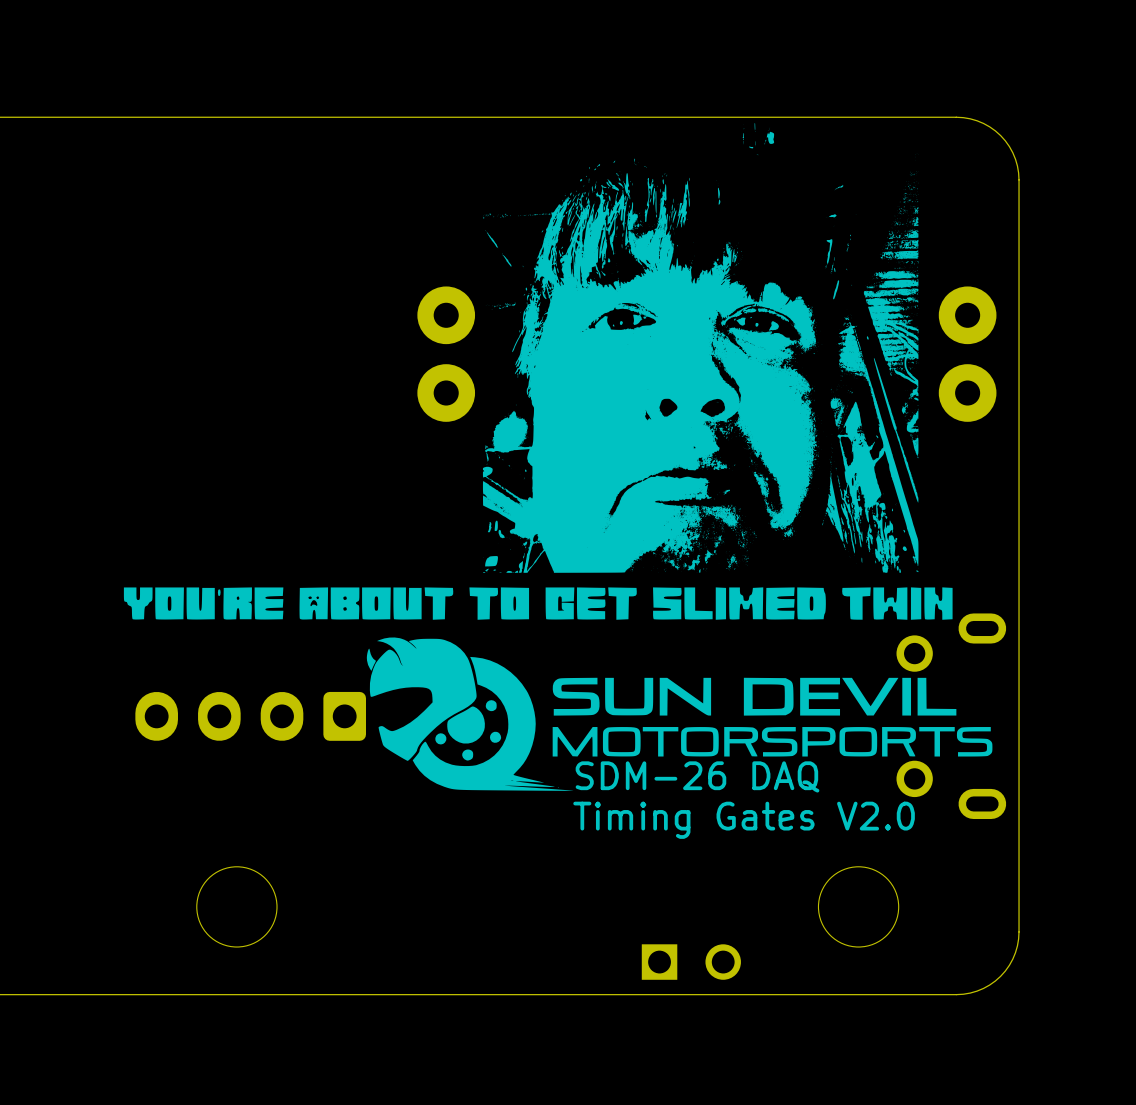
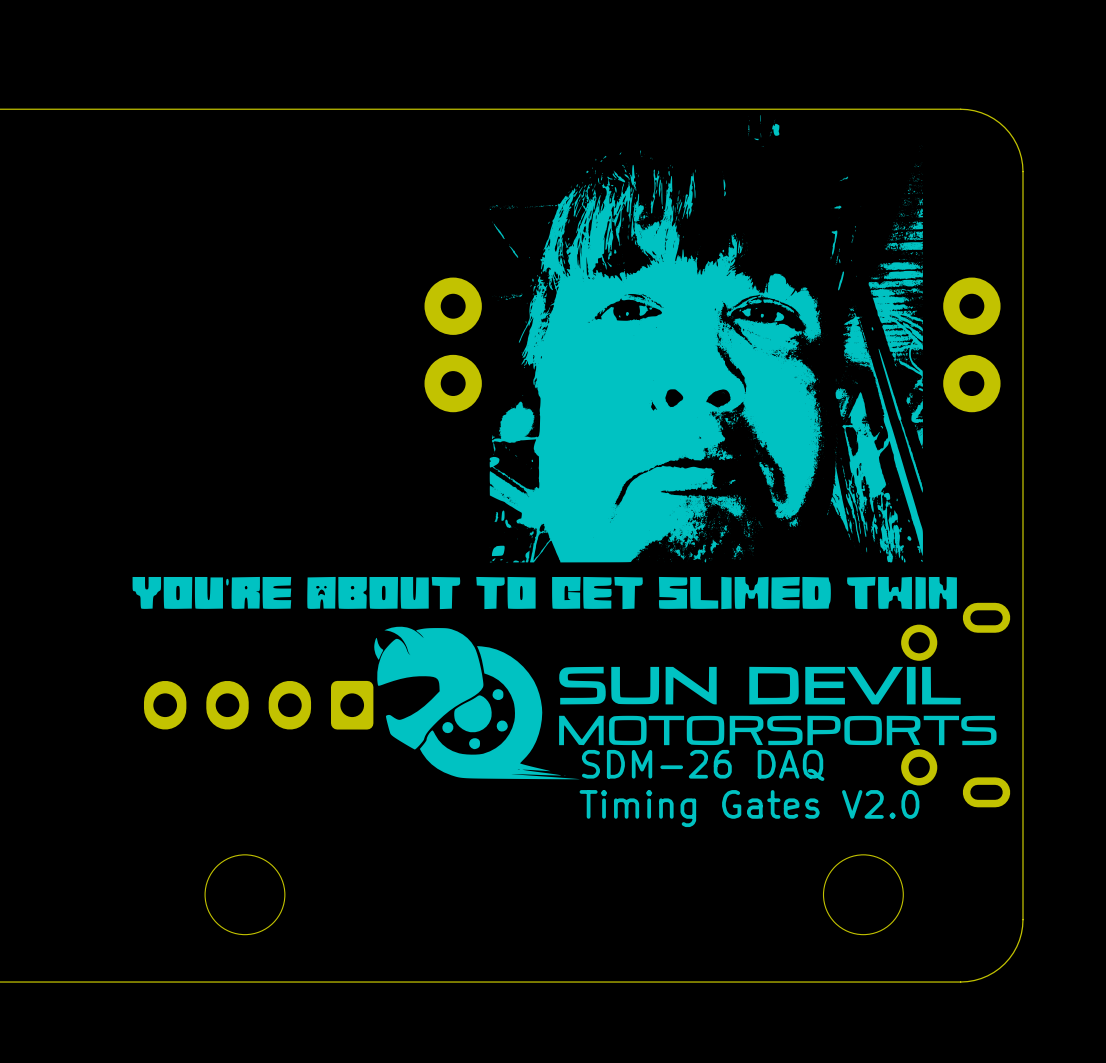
part: (691, 962) -> none

